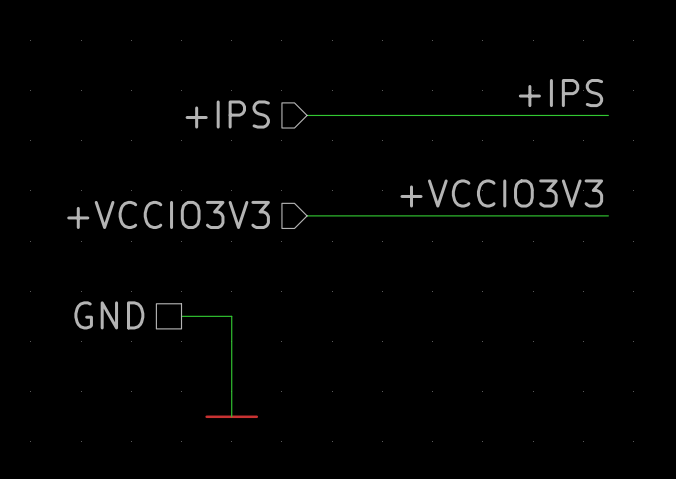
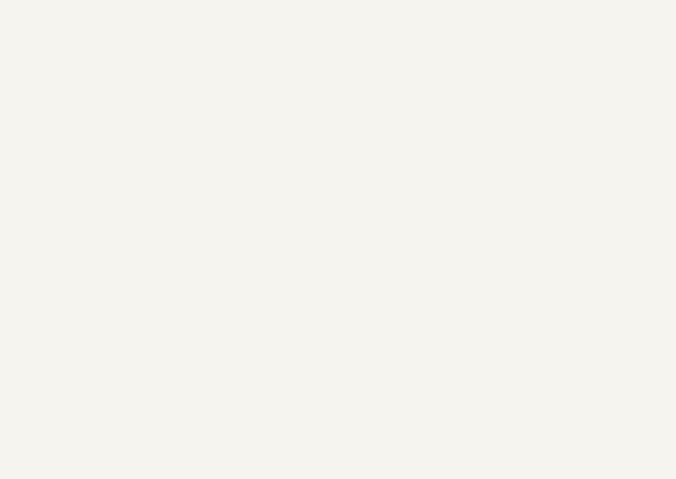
label: +IPS (560, 93) -> none
hierarchical label: +IPS (227, 114) -> none
wire: (307, 115) (608, 115) -> none
label: +VCCIO3V3 (501, 193) -> none
hierarchical label: +VCCIO3V3 (168, 214) -> none
wire: (307, 215) (608, 215) -> none
hierarchical label: GND (109, 315) -> none
wire: (181, 316) (231, 316) (231, 416) -> none
power symbol: (231, 416) -> none

